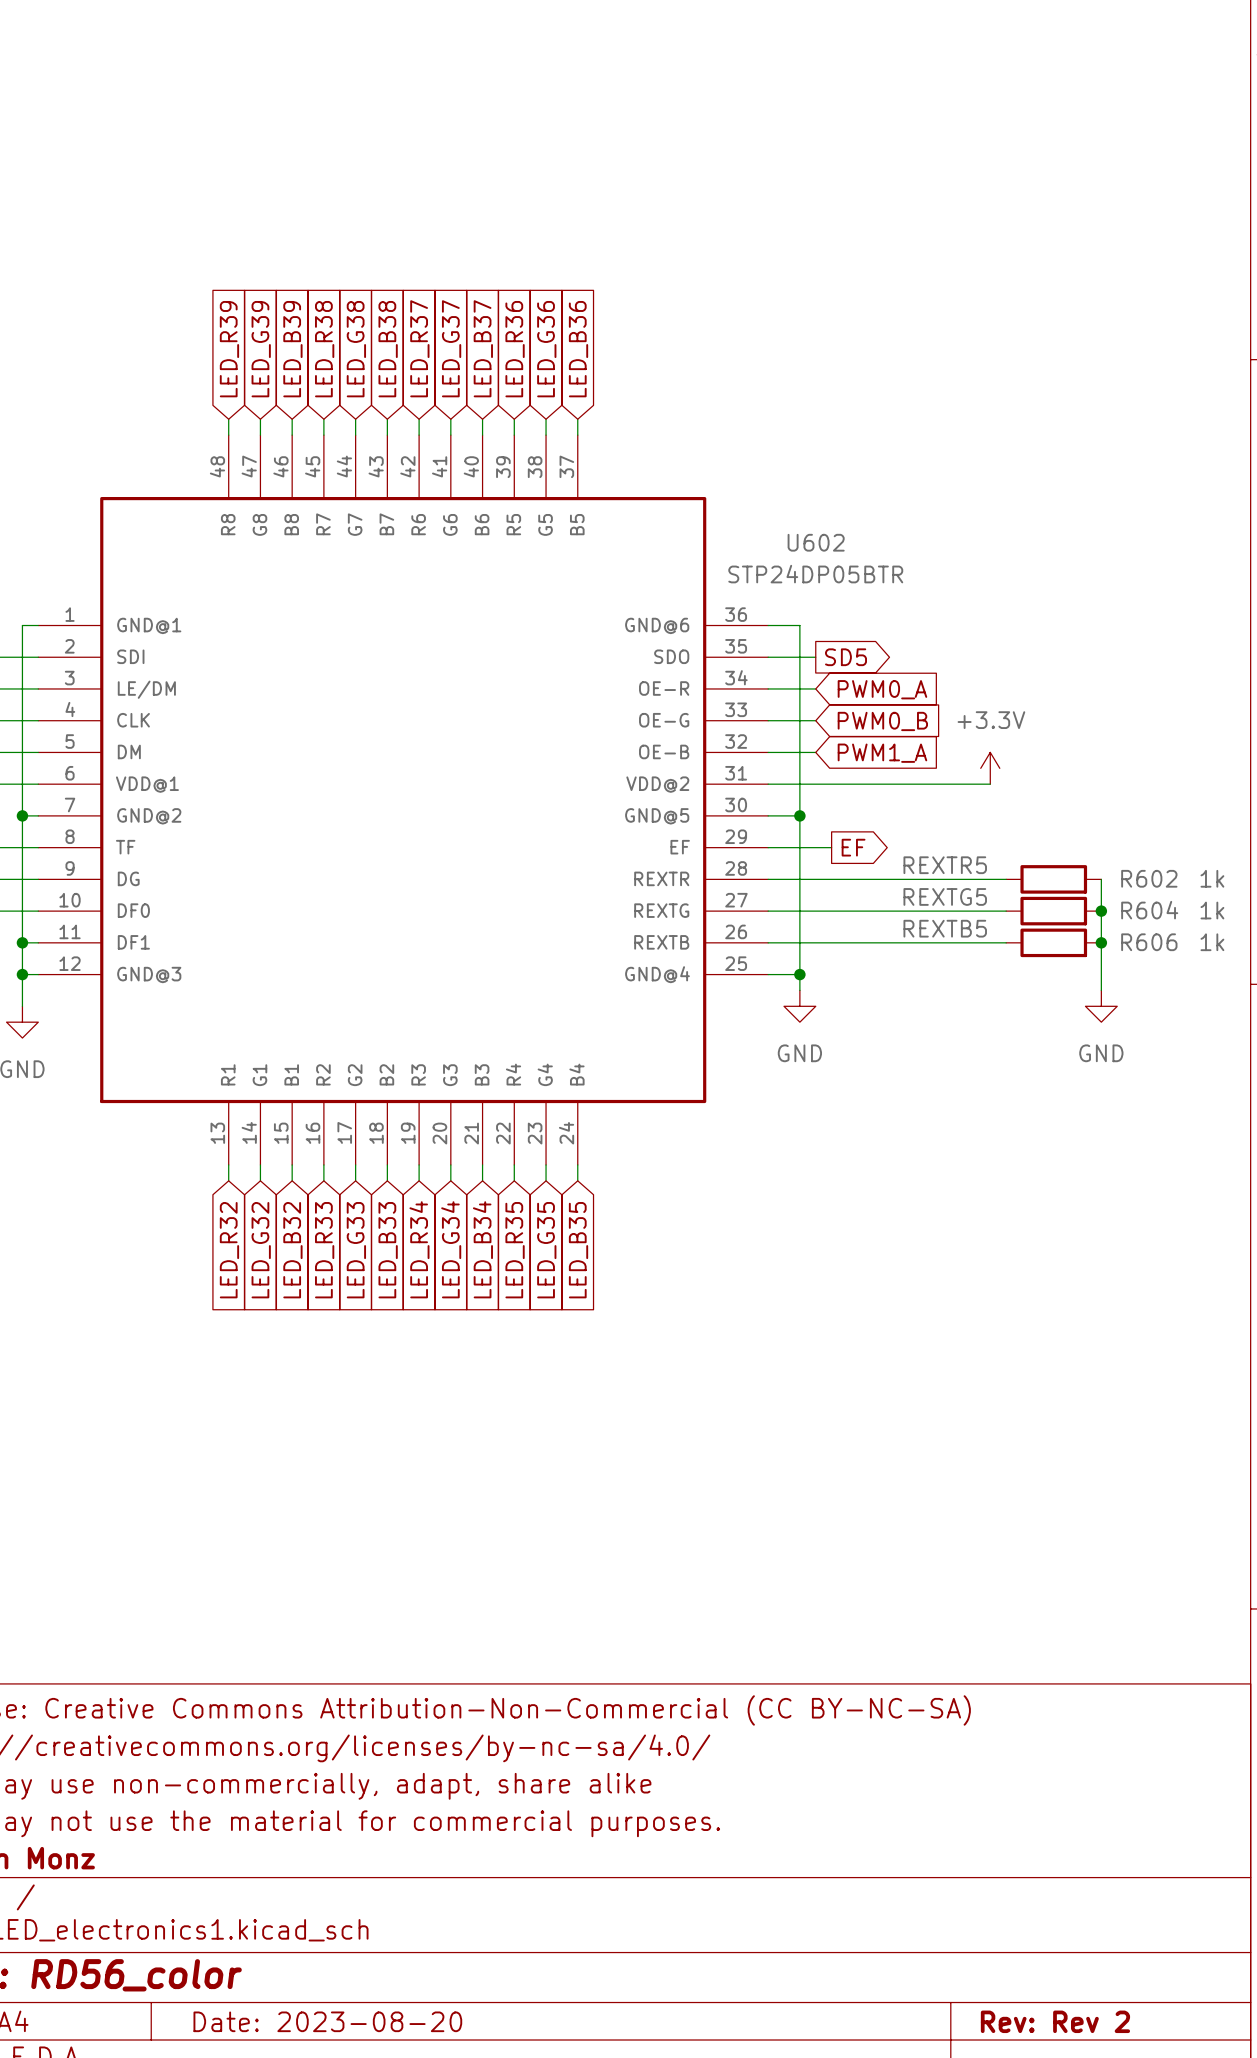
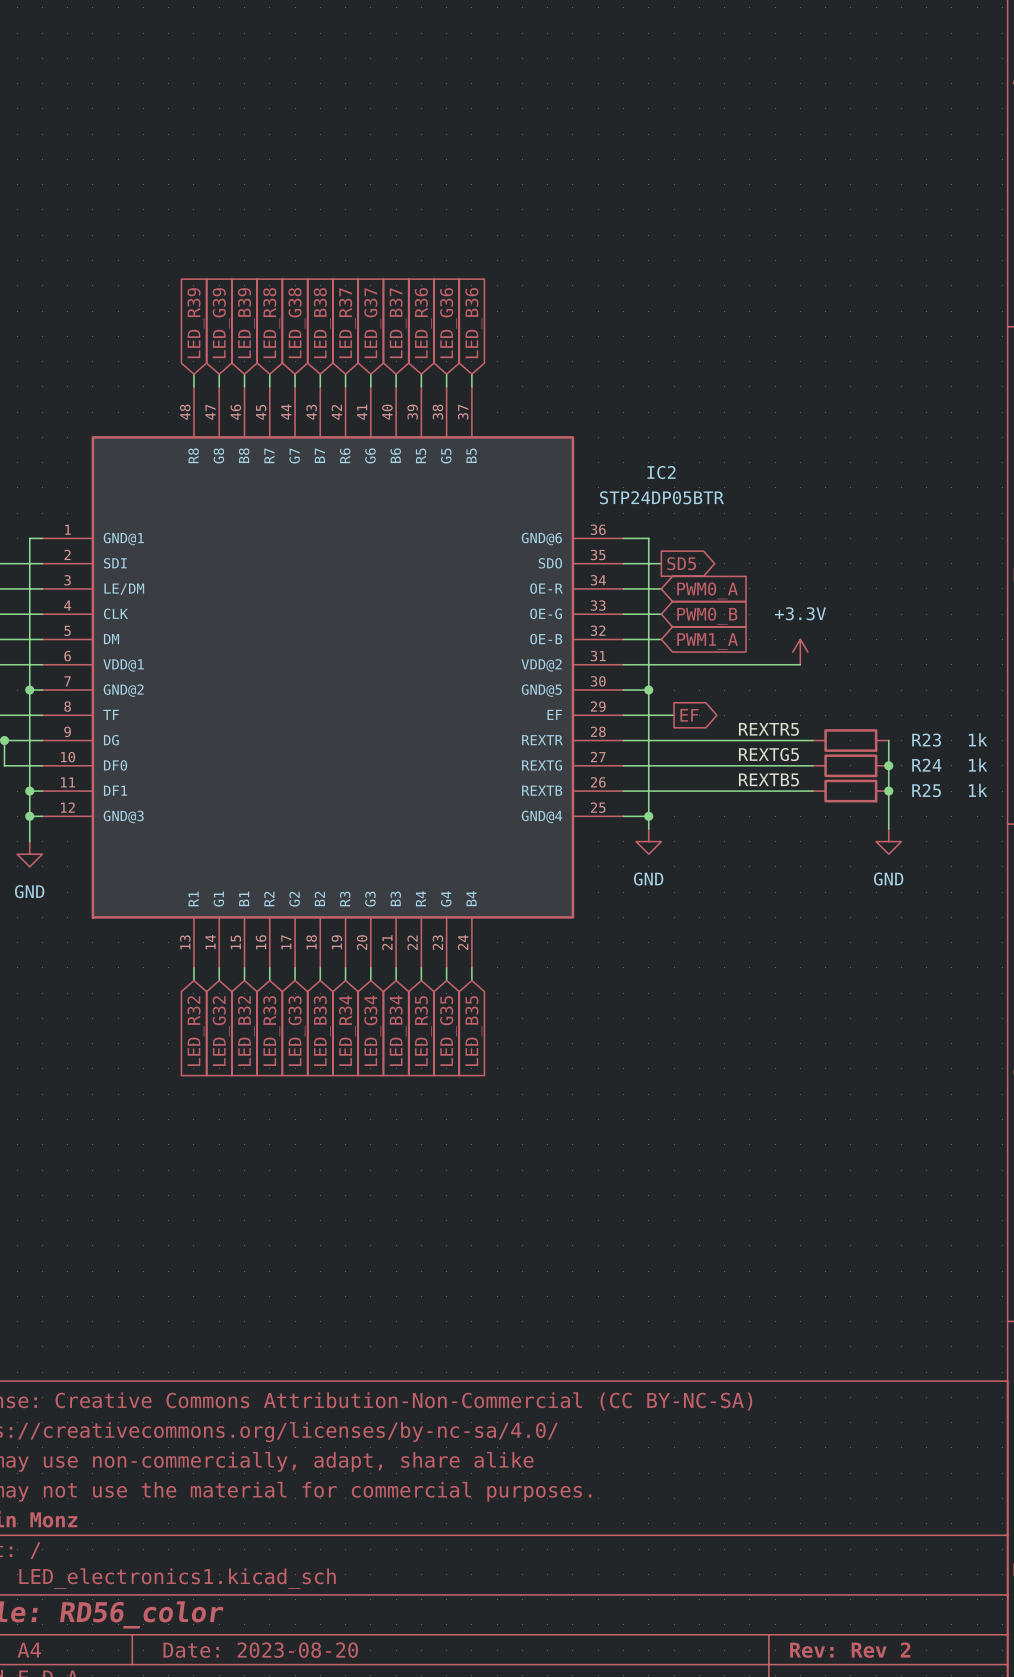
U602 name: U602 (816, 542) -> IC2 (661, 472)
R602 name: R602 (1149, 878) -> R23 (926, 740)
R604 name: R604 (1149, 910) -> R24 (926, 765)
R606 name: R606 (1149, 942) -> R25 (926, 790)

